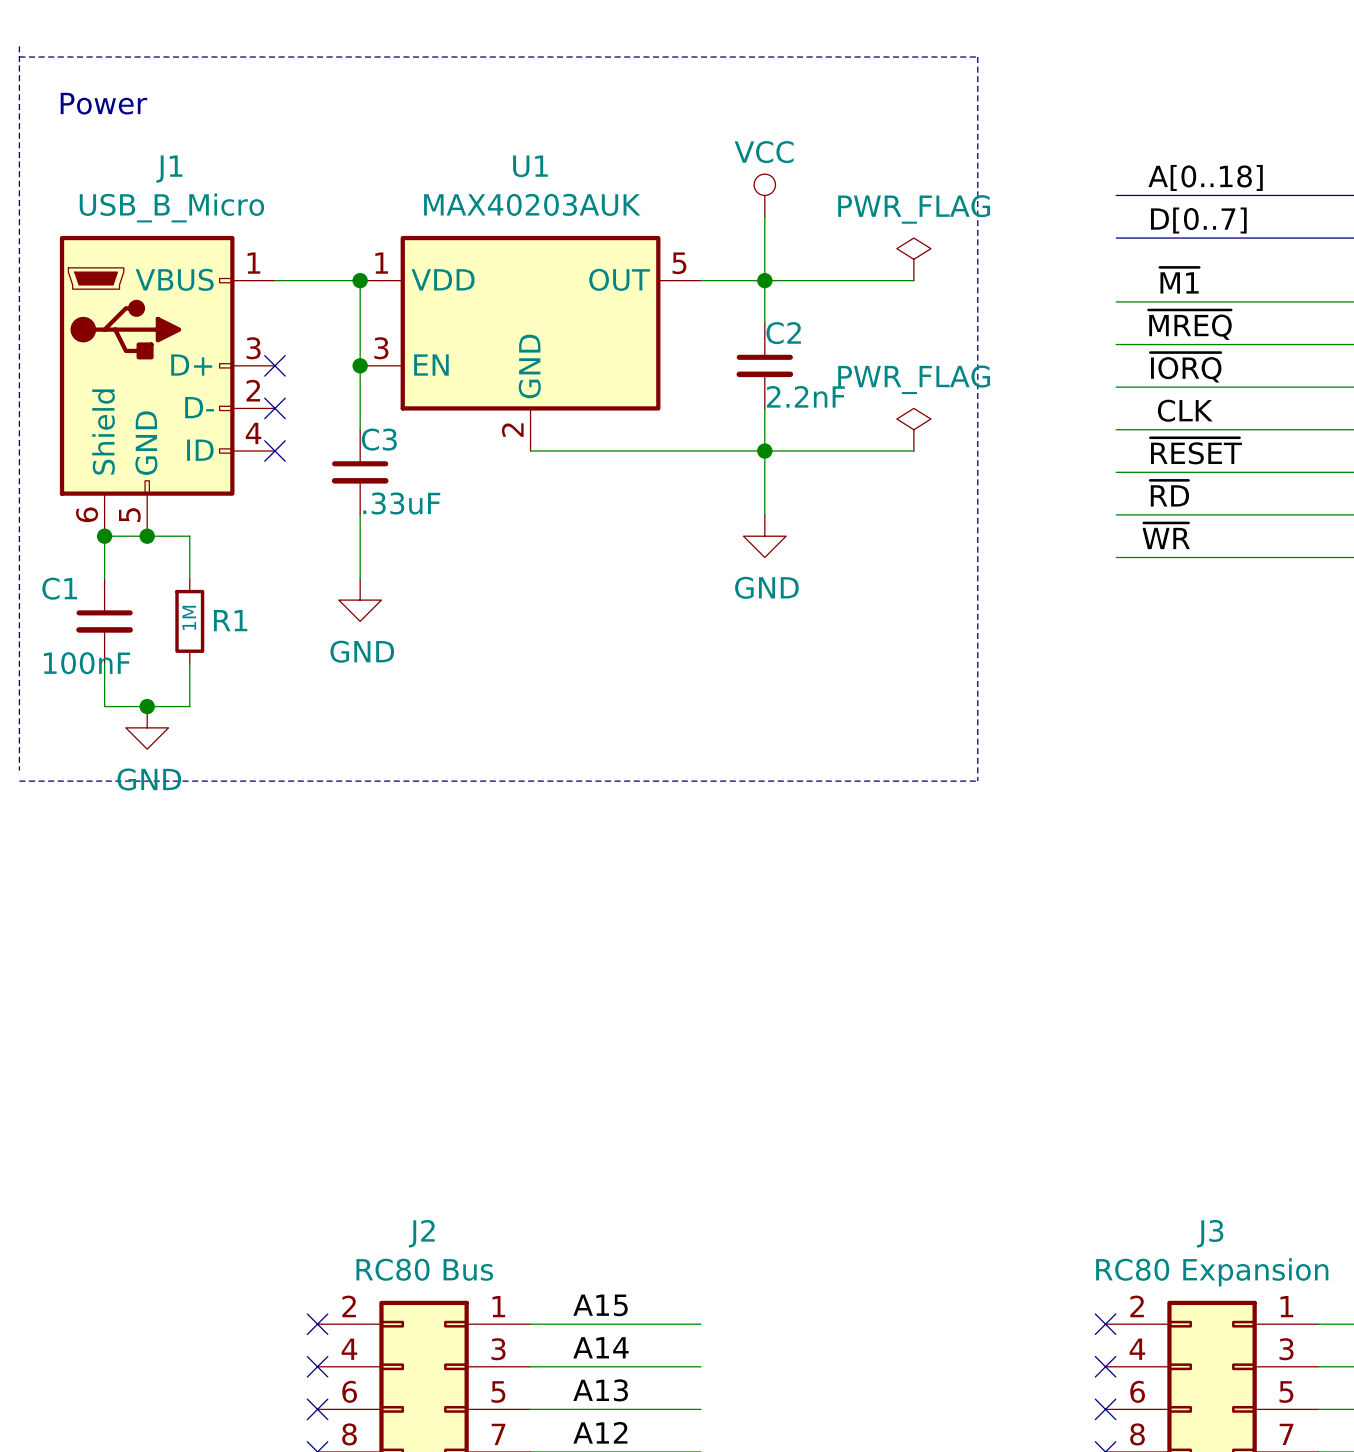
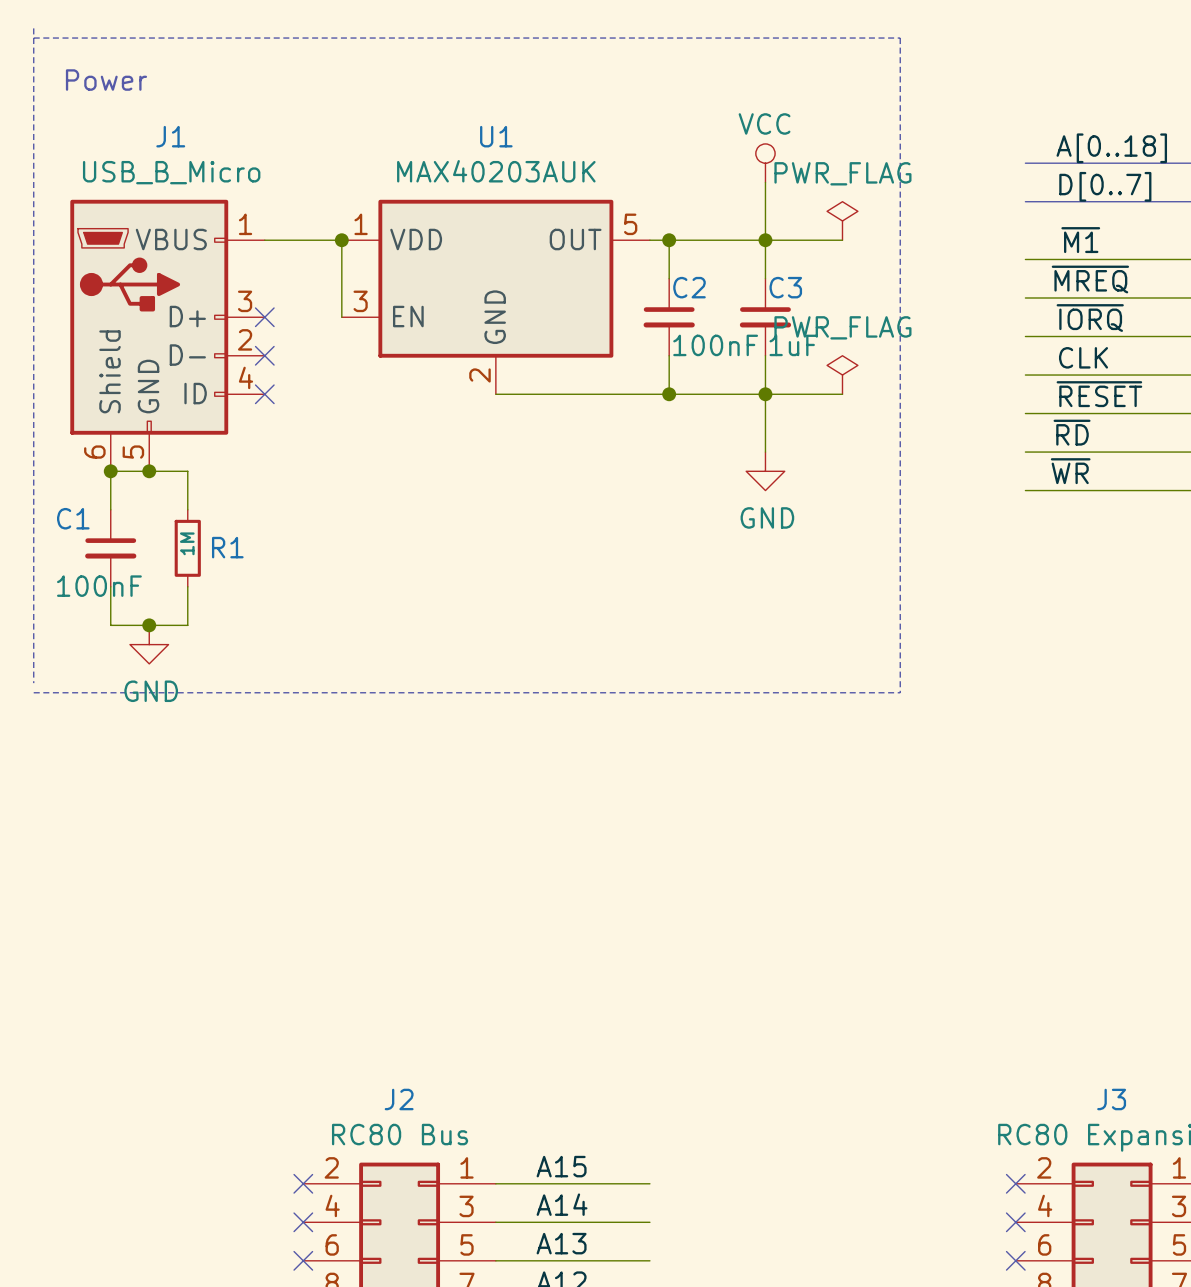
power symbol position: VCC (764, 195) -> VCC (765, 163)
wire: (764, 216) (764, 323) -> (765, 182) (765, 278)
wire: none -> (669, 240) (669, 278)
junction: none -> (669, 240)
junction: (764, 280) -> none
junction: none -> (765, 240)
wire: (360, 365) (360, 429) -> none
junction: (360, 365) -> none
C2 position: (764, 365) -> (669, 317)
C2 value: 2.2nF (805, 396) -> 100nF (715, 345)
wire: none -> (669, 355) (669, 394)
wire: (764, 408) (764, 514) -> (765, 355) (765, 452)
junction: none -> (669, 394)
junction: (764, 451) -> none
junction: none -> (765, 394)
C3 position: (360, 472) -> (765, 317)
C3 value: .33uF (401, 503) -> 1uF (793, 345)
wire: (360, 514) (360, 578) -> none
power symbol position: GND (764, 536) -> GND (765, 471)
power symbol: GND (360, 600) -> none

